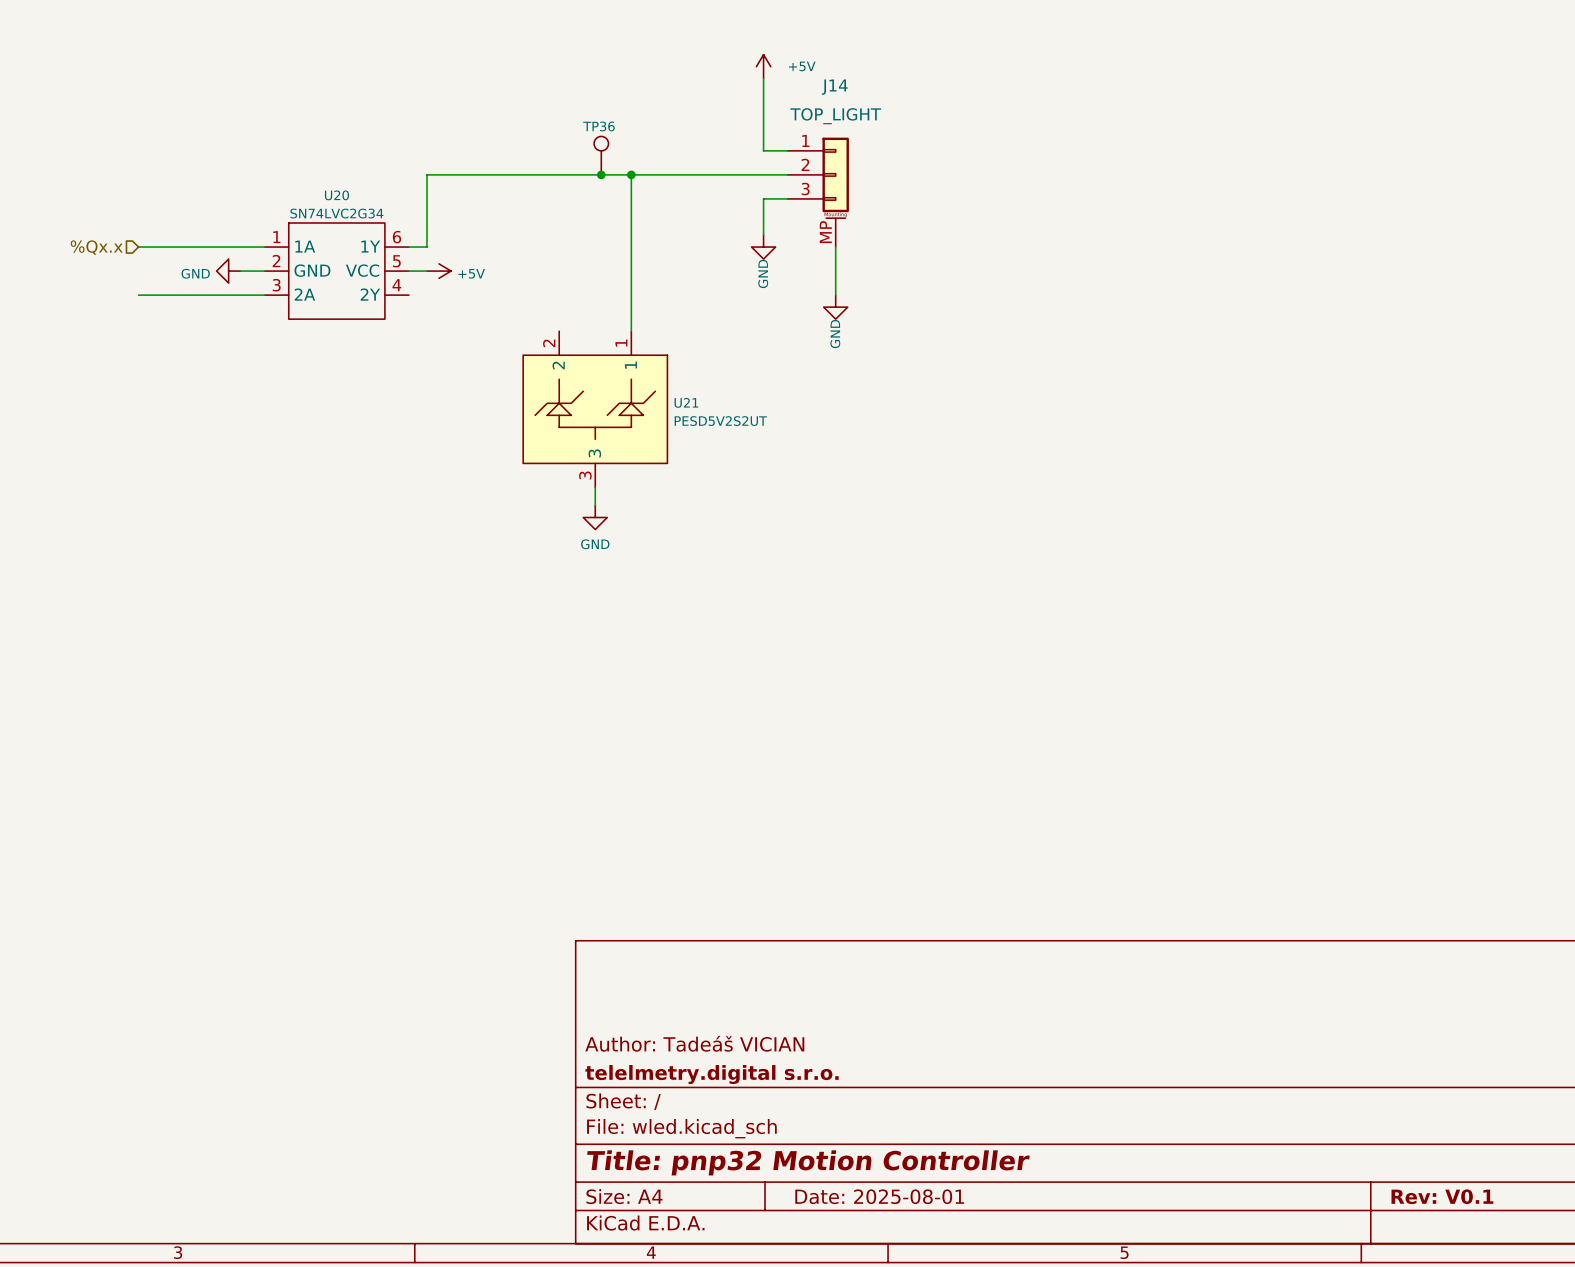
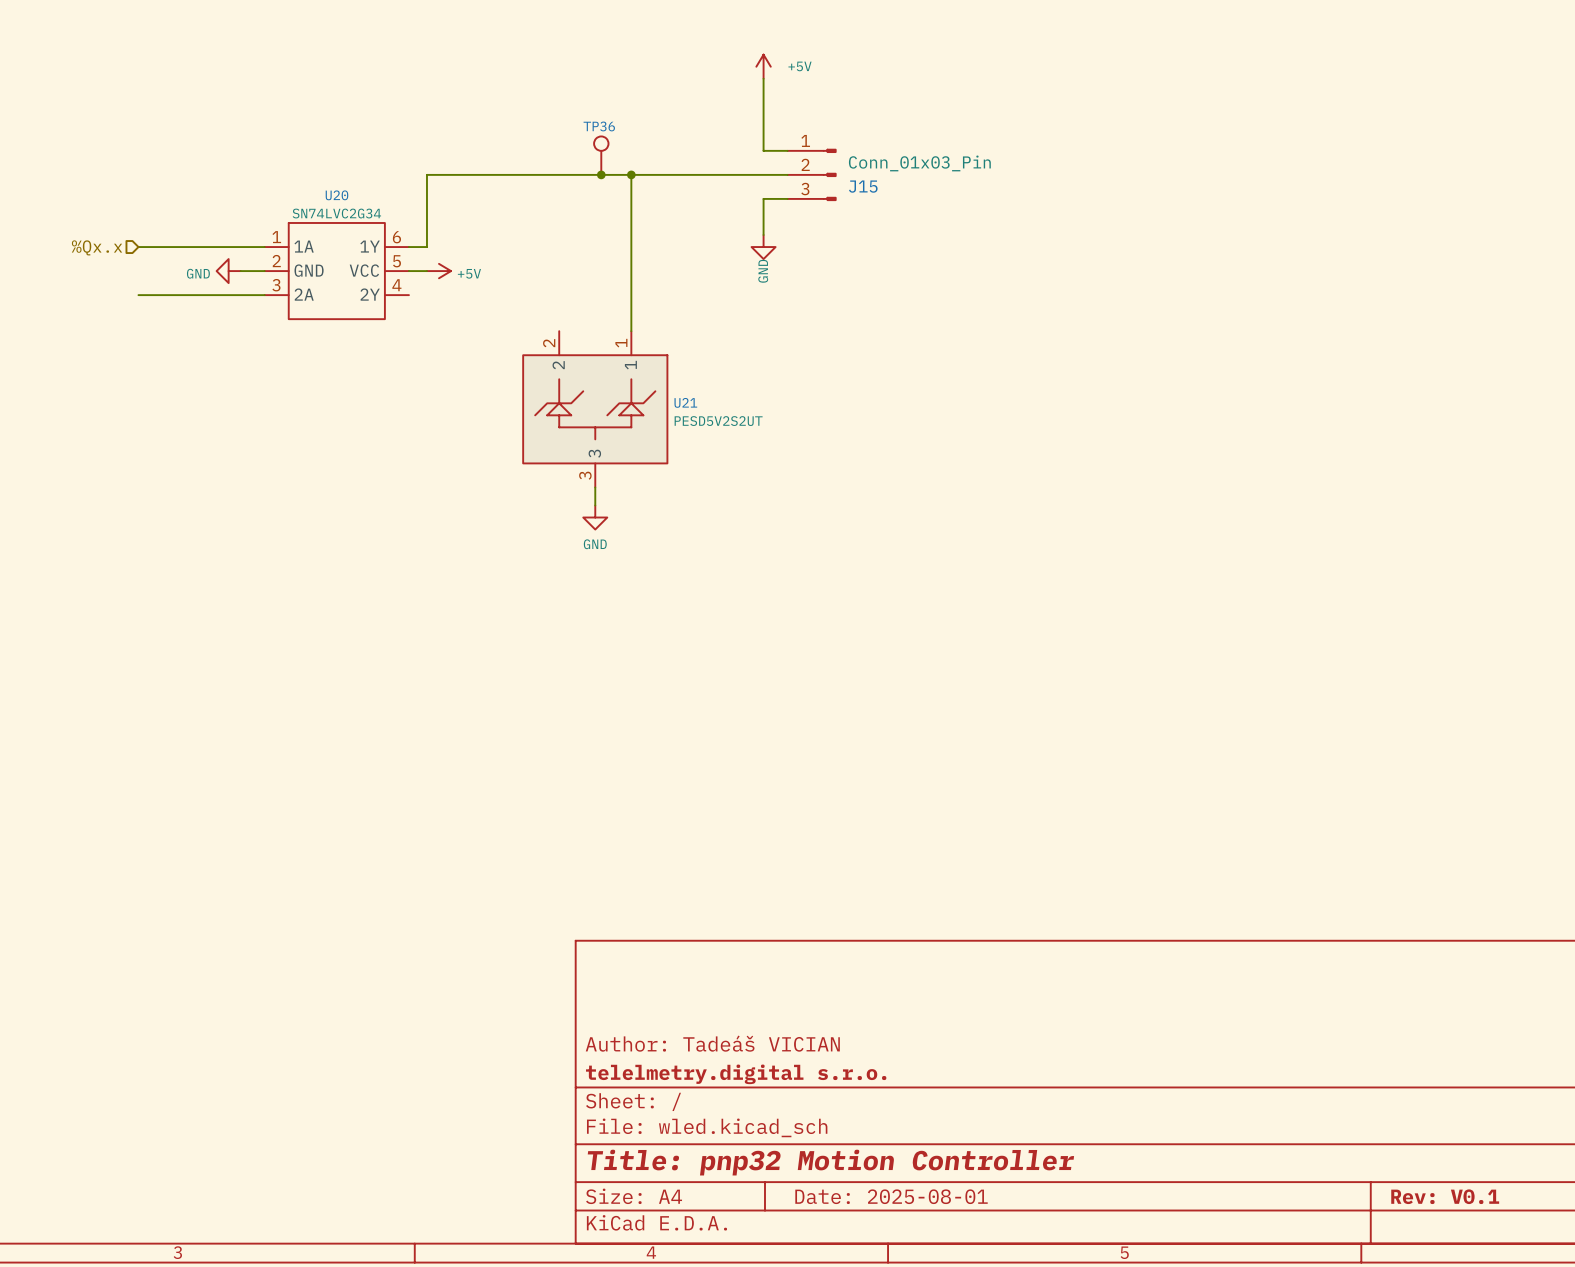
J15: none -> Conn_01x03_Pin (812, 174)
J14: TOP_LIGHT (818, 192) -> none
wire: (835, 247) (835, 295) -> none
power symbol: GND (835, 307) -> none

